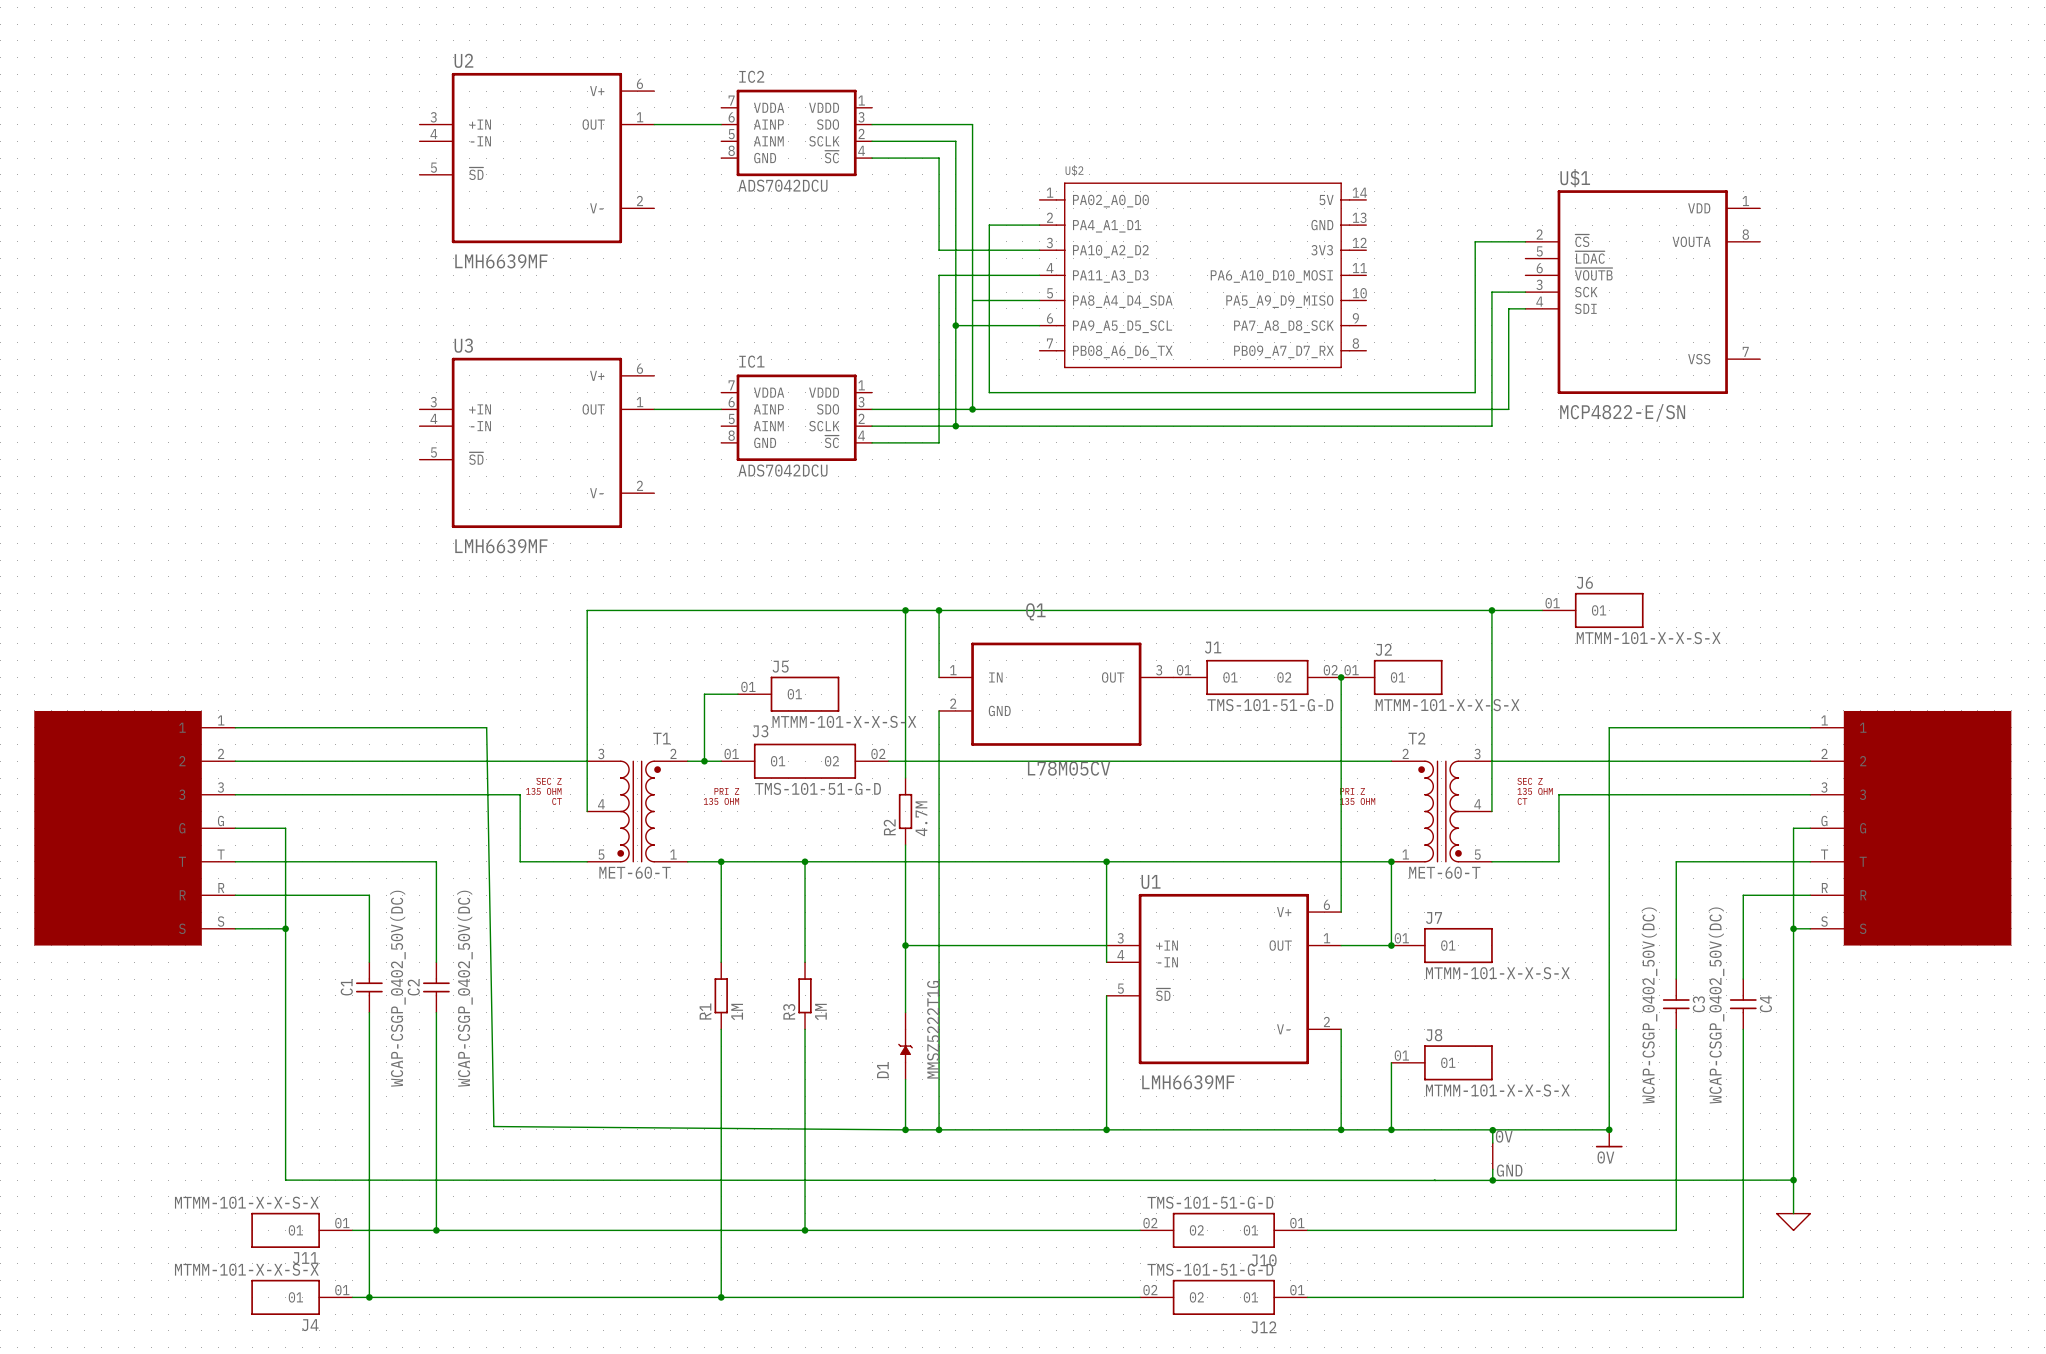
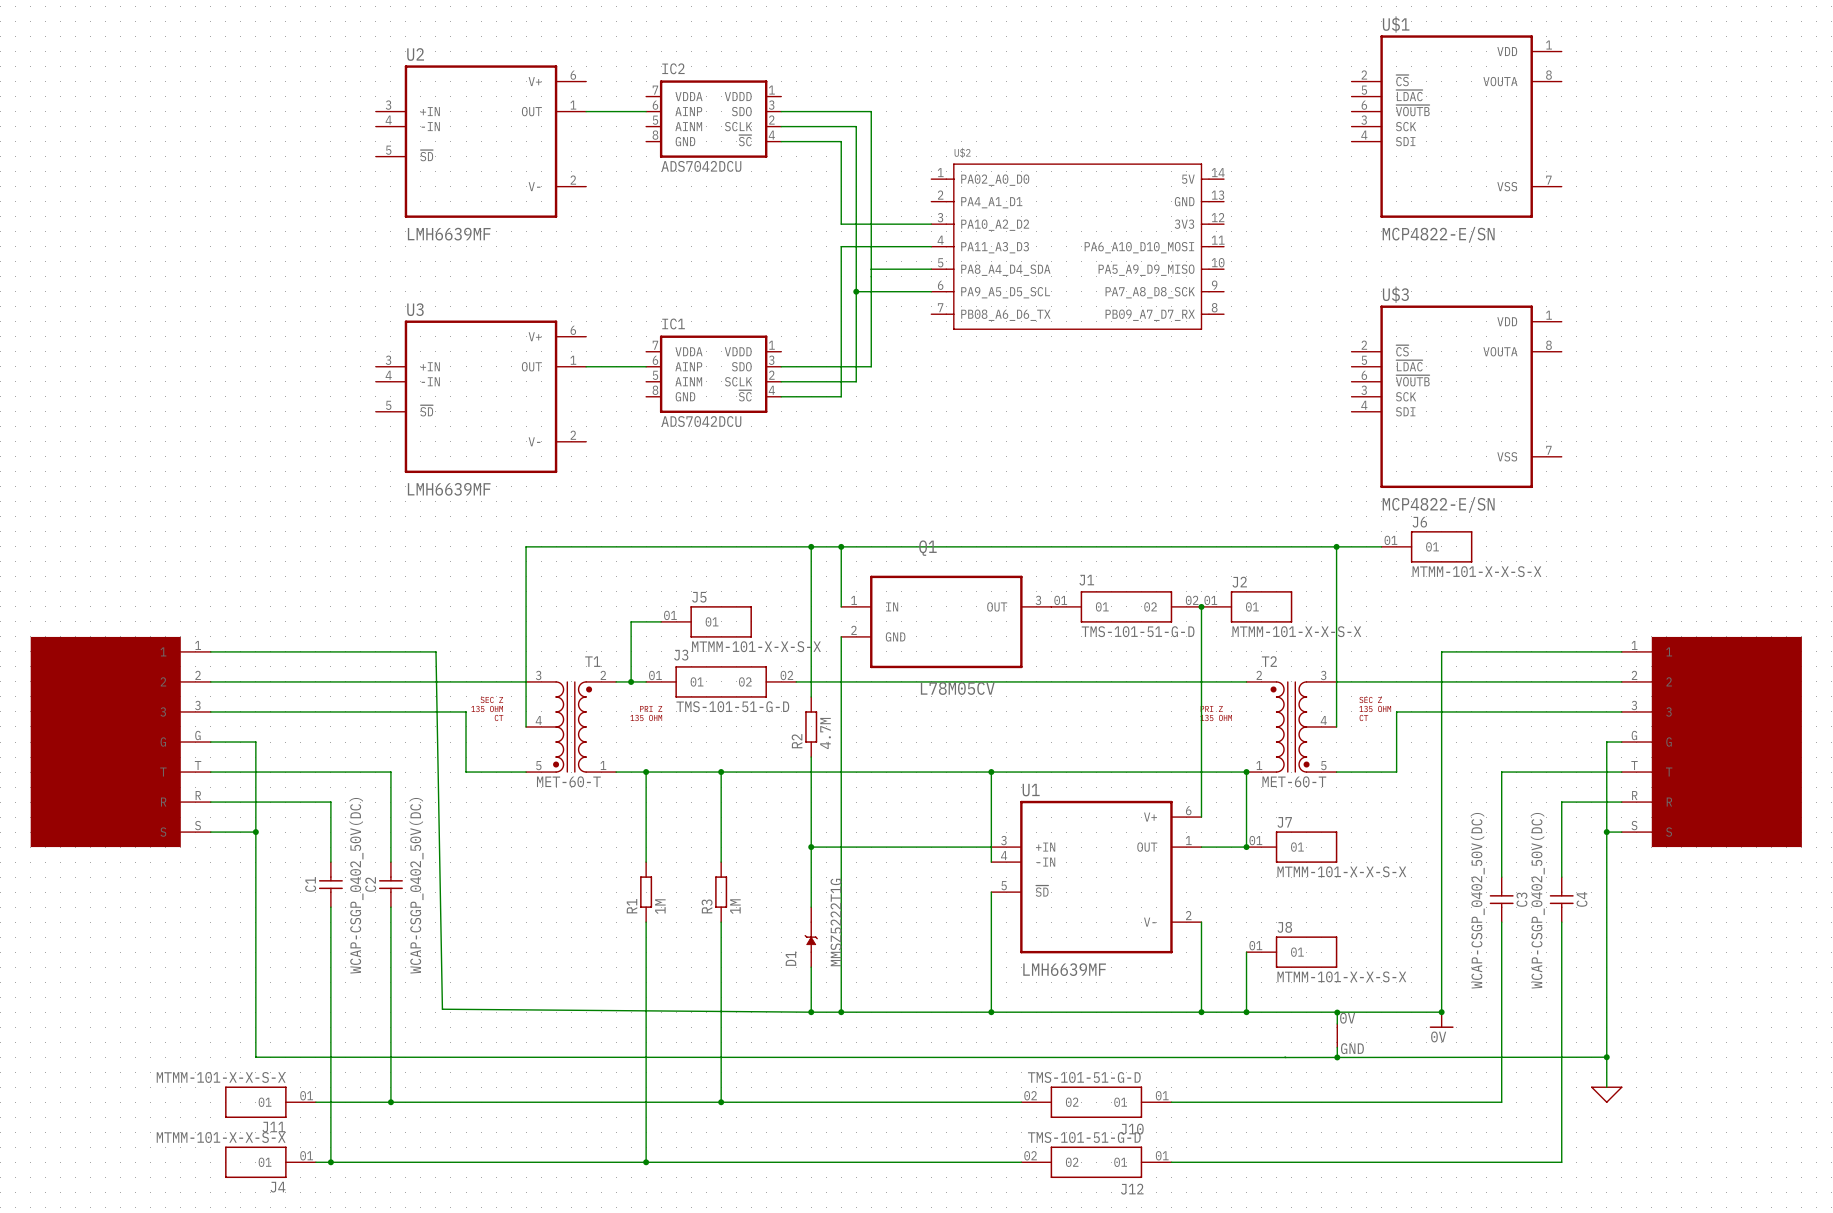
wire: (1039, 225) (989, 225) (989, 392) (1475, 392) (1475, 241) (1525, 241) -> none
wire: (1525, 292) (1491, 292) (1491, 426) (955, 426) -> none
U$1 position: (1642, 292) -> (1456, 126)
wire: (1525, 308) (1508, 308) (1508, 409) (972, 409) -> none
junction: (972, 409) -> none
junction: (955, 426) -> none
U$3: none -> MCP4822-E/SN (1456, 396)

